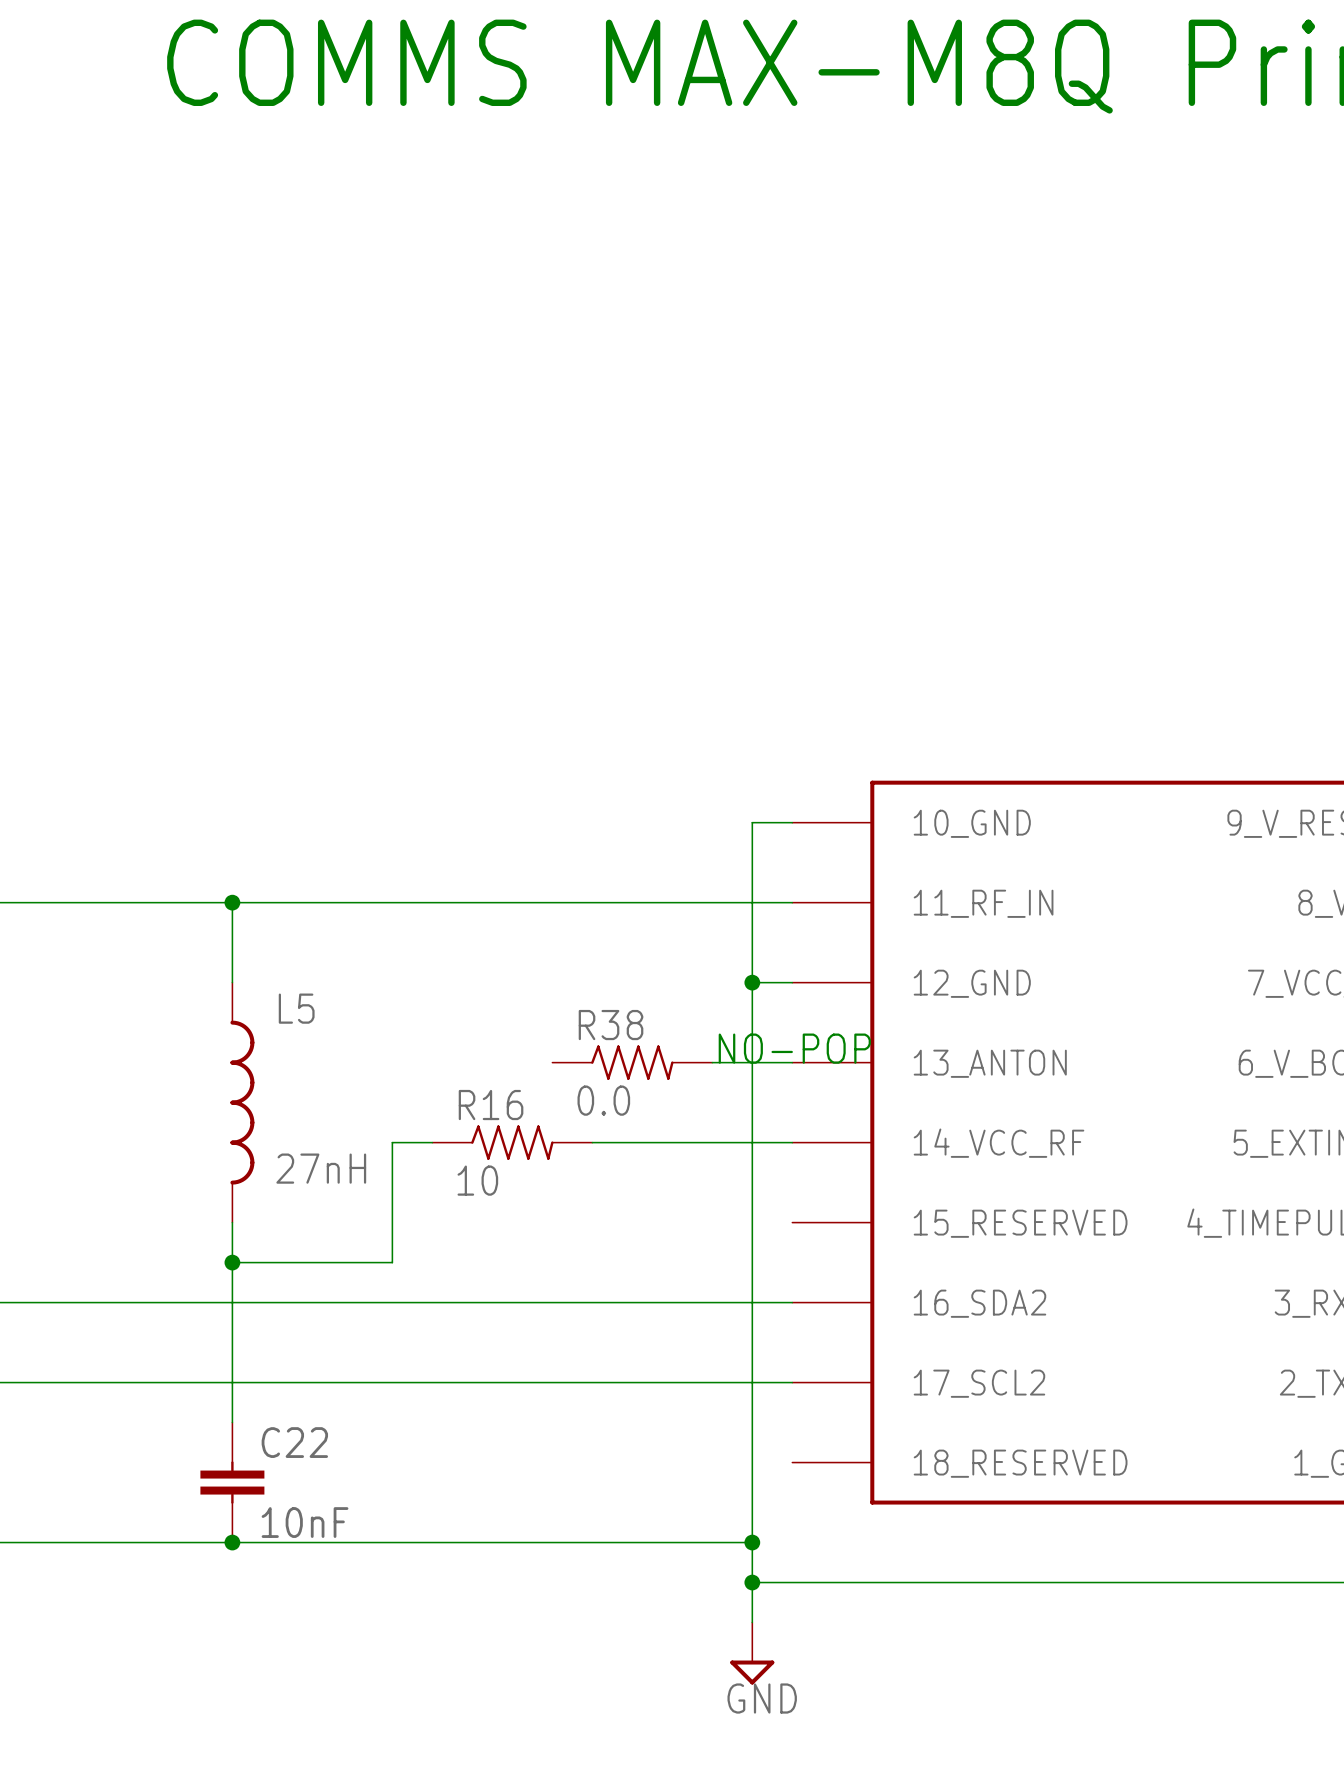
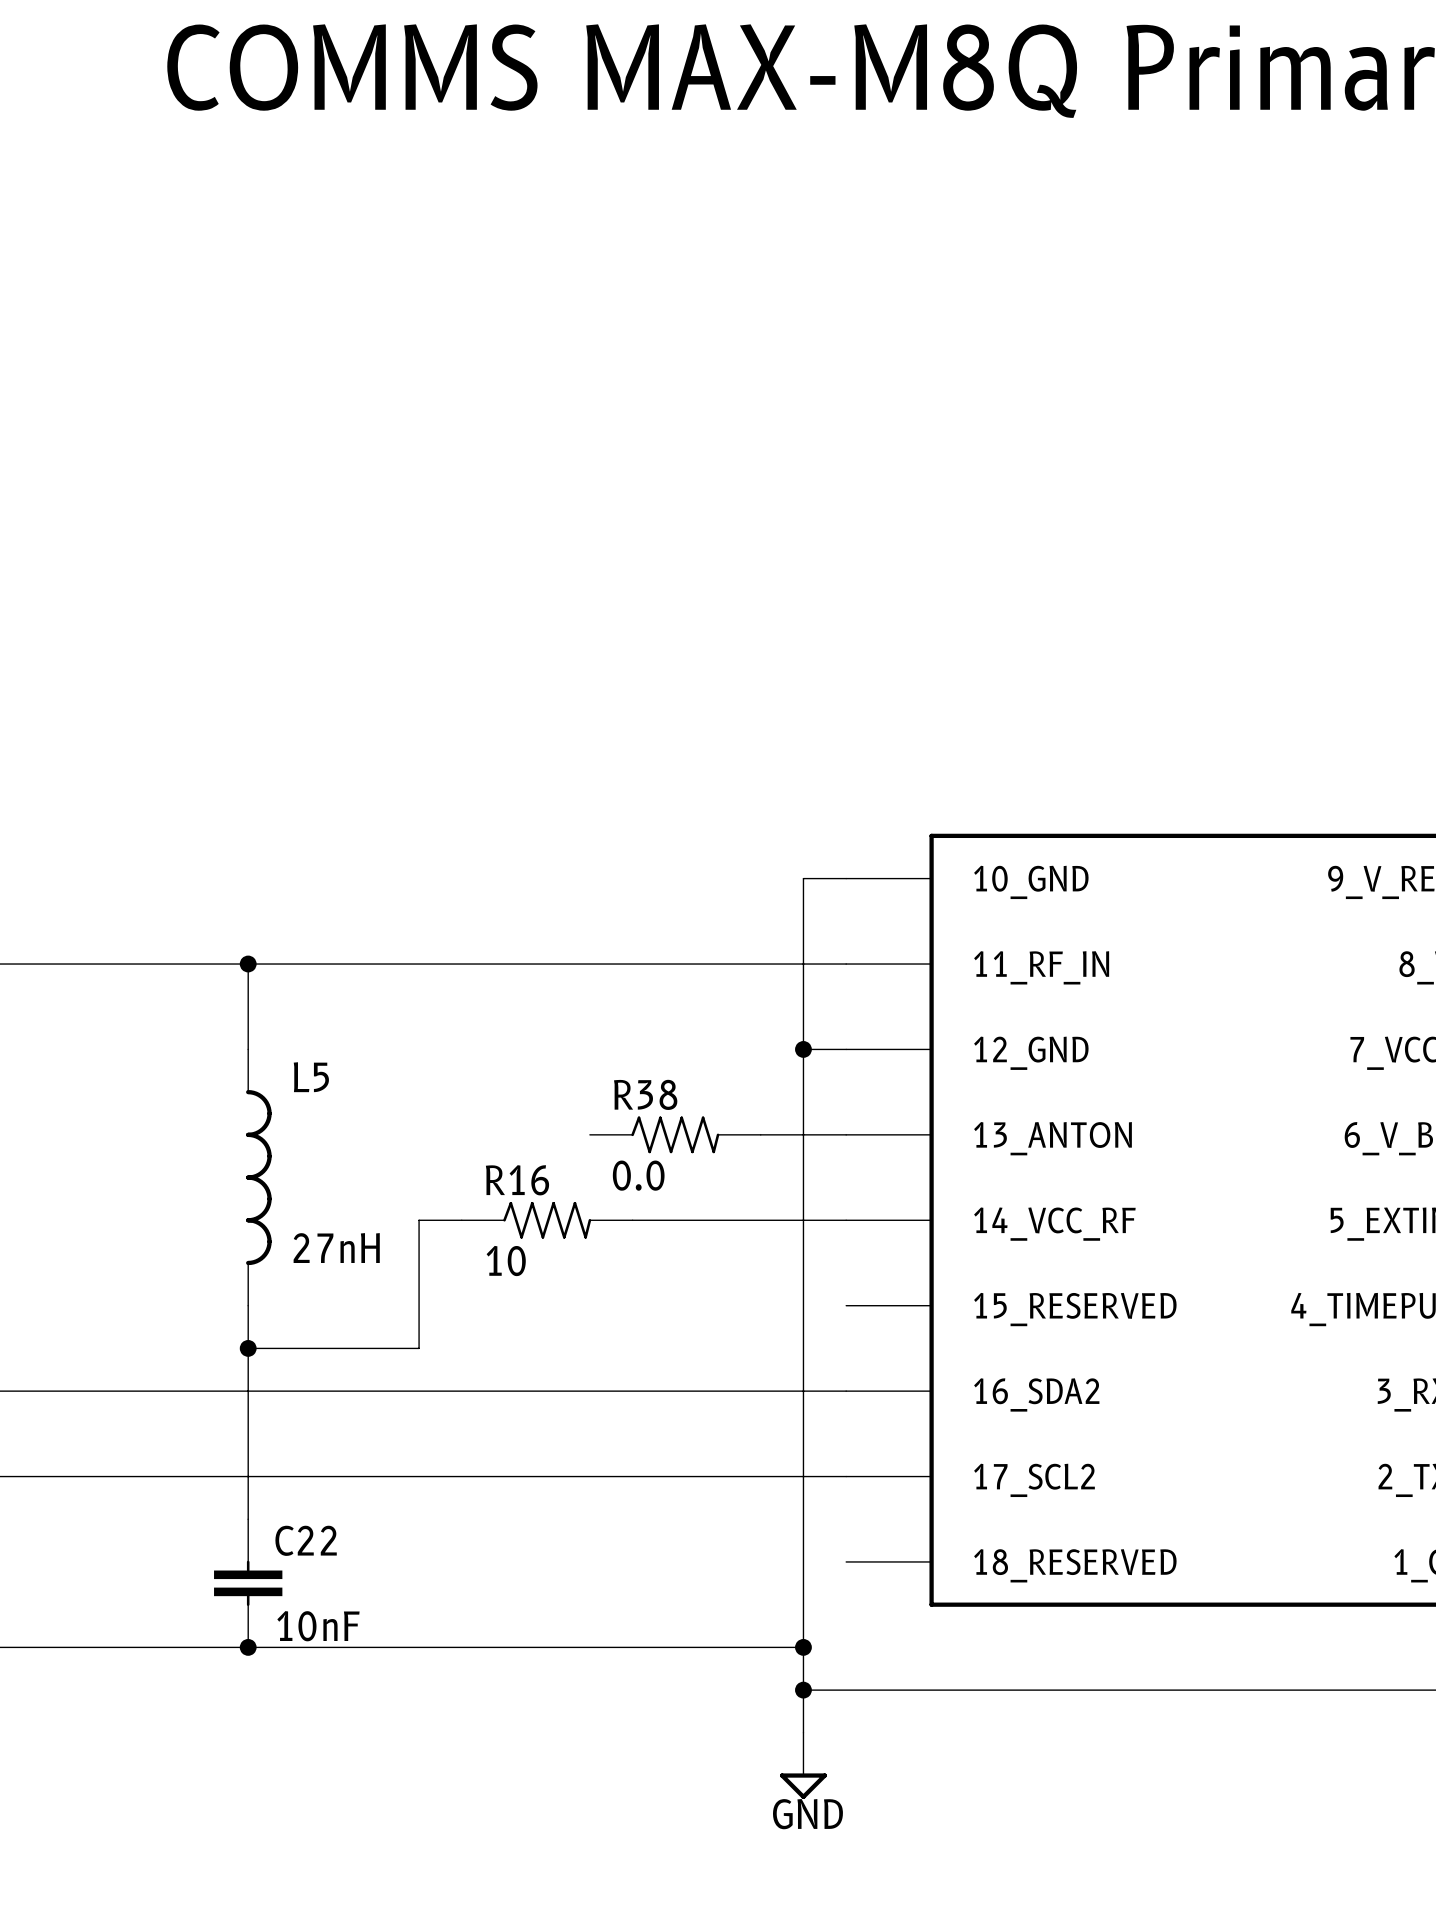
text: NO-POP (794, 1048) -> none

